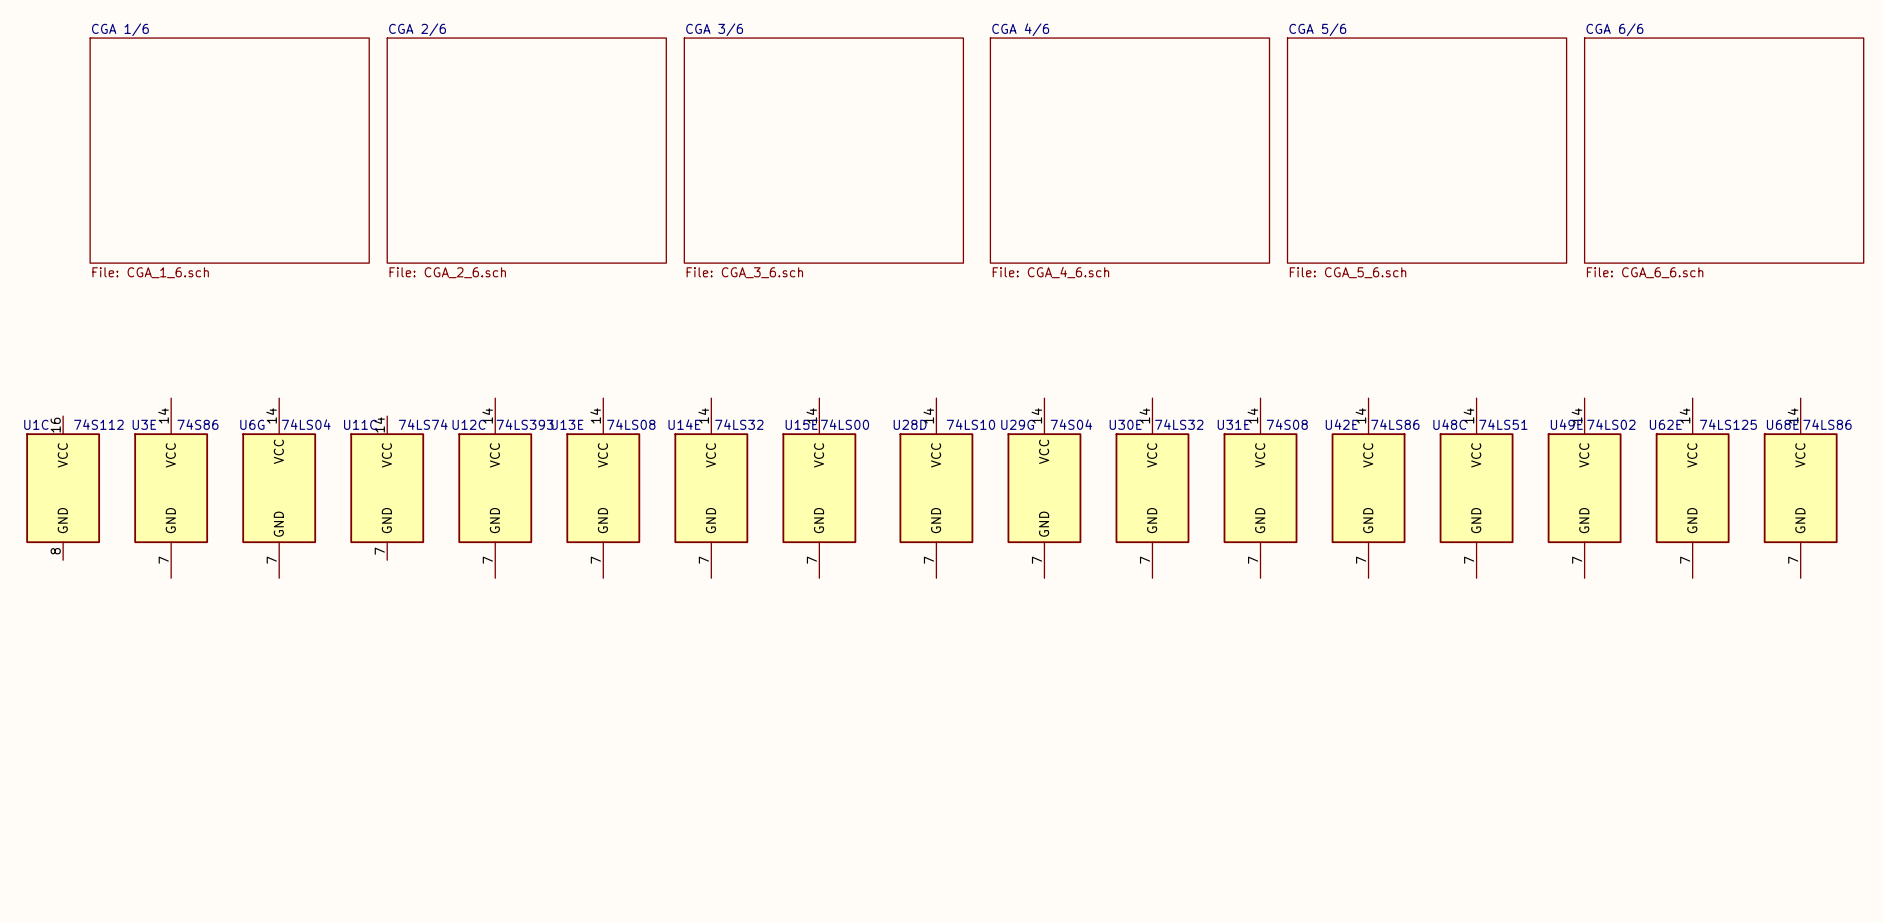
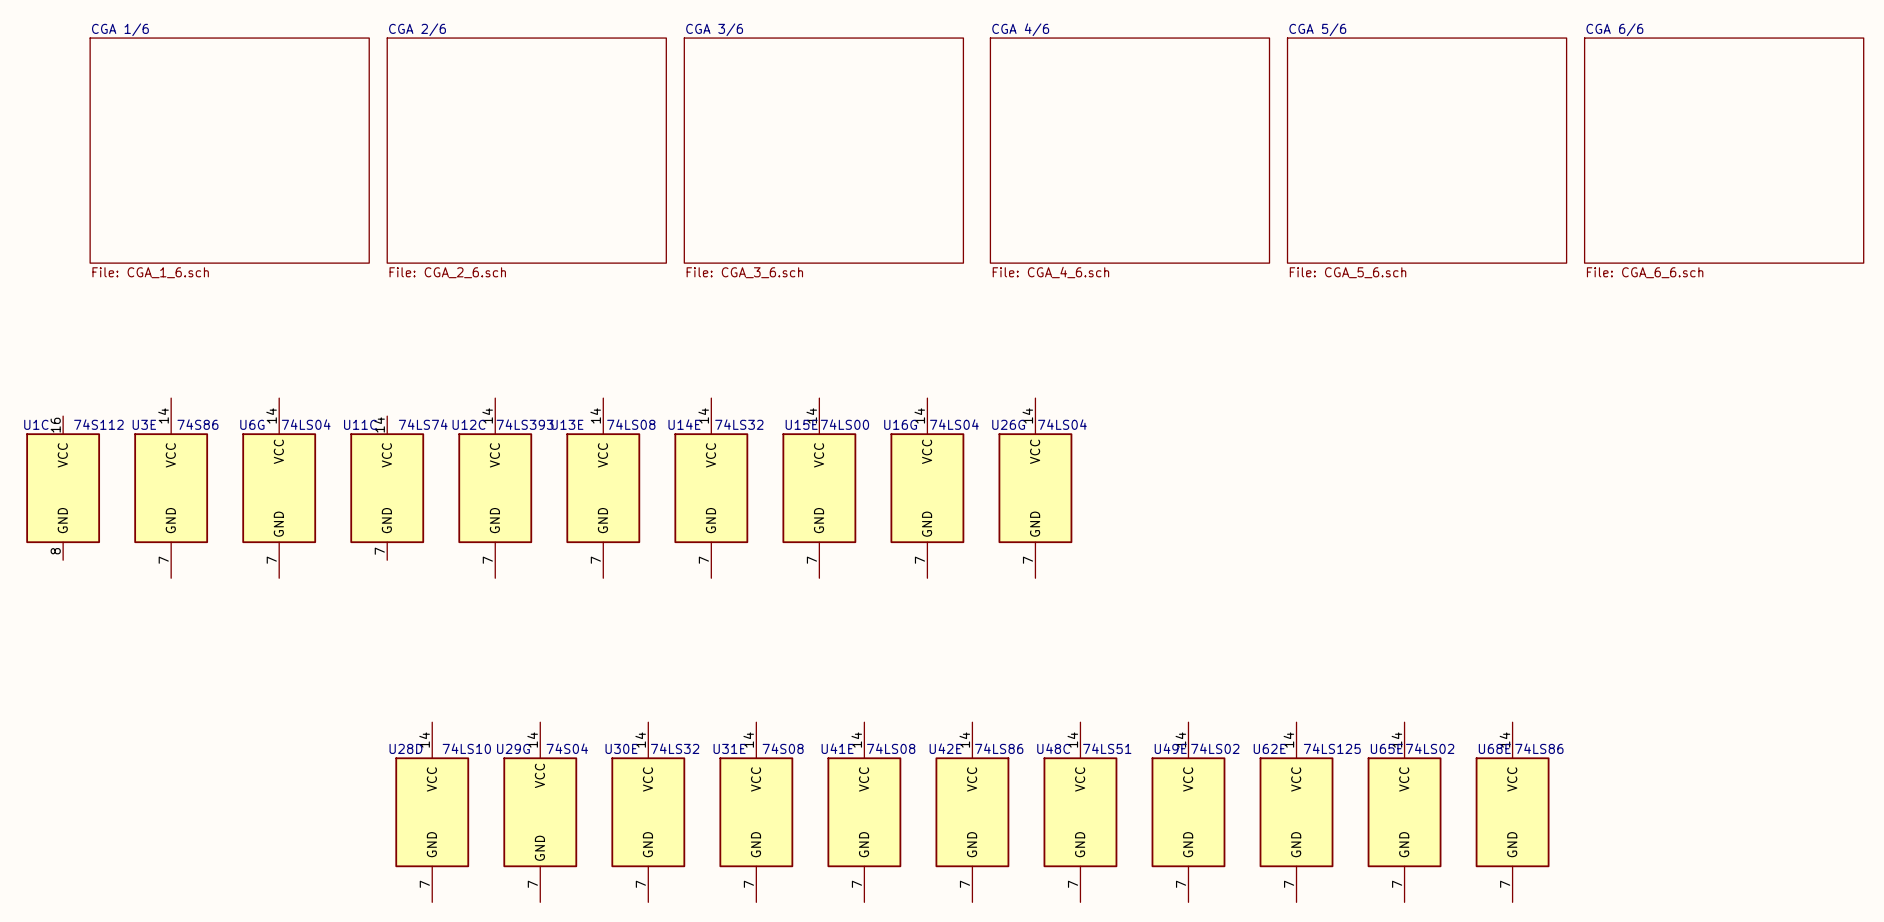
U16G: none -> 74LS04 (927, 488)
U28D position: (936, 488) -> (432, 812)
U26G: none -> 74LS04 (1035, 488)
U29G position: (1044, 488) -> (540, 812)
U30E position: (1152, 488) -> (648, 812)
U31E position: (1260, 488) -> (756, 812)
U42E position: (1368, 488) -> (972, 812)
U48C position: (1476, 488) -> (1080, 812)
U49E position: (1584, 488) -> (1188, 812)
U62E position: (1692, 488) -> (1296, 812)
U68E position: (1800, 488) -> (1512, 812)
U41E: none -> 74LS08 (864, 812)
U65E: none -> 74LS02 (1404, 812)

